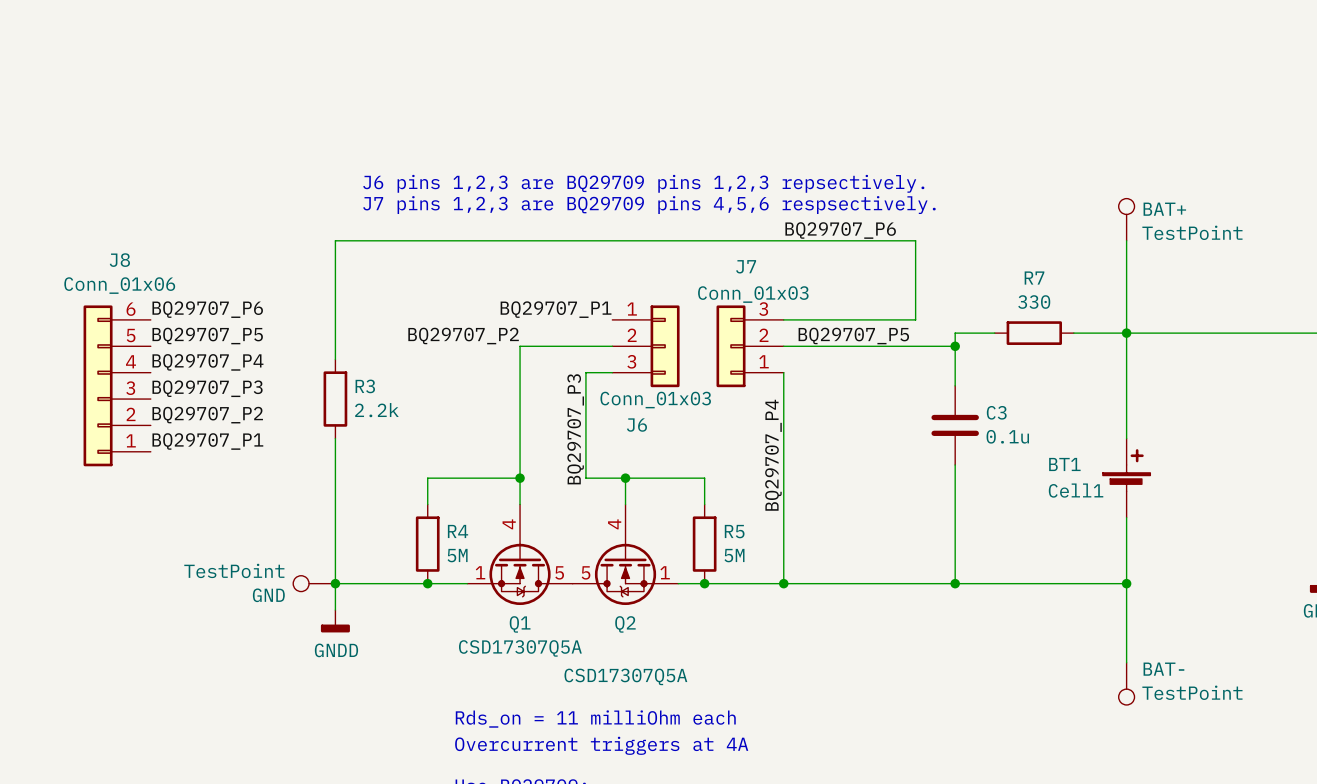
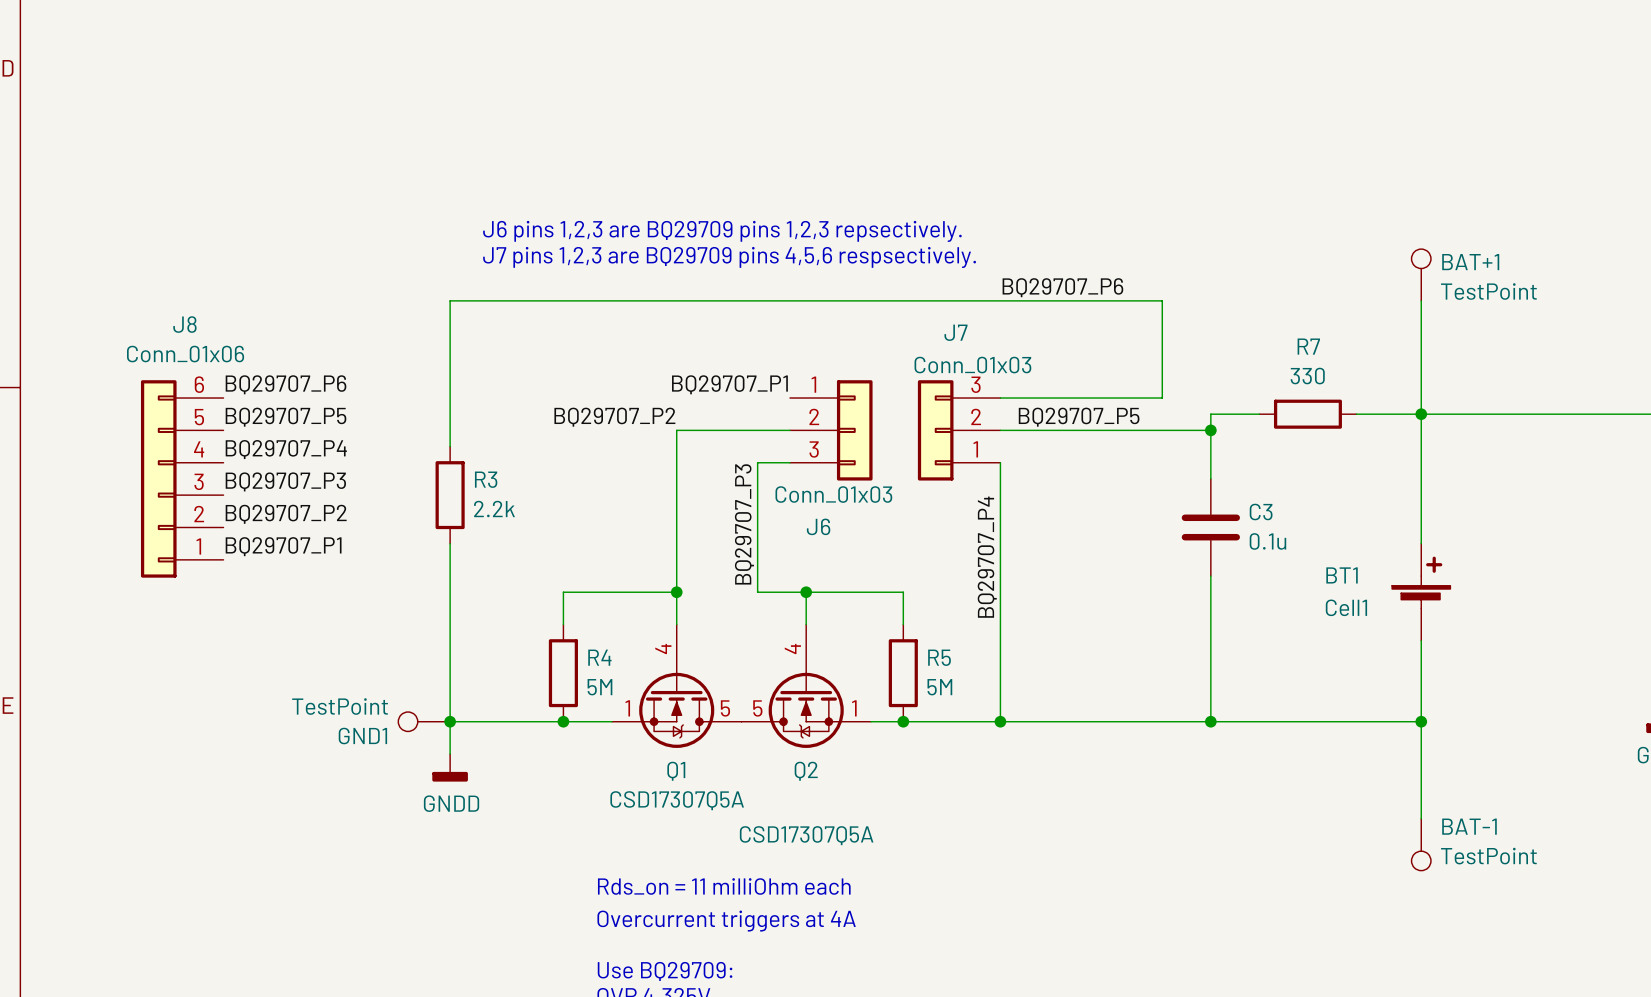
BAT+ name: BAT+ (1164, 209) -> BAT+1 (1470, 262)
GND name: GND (268, 595) -> GND1 (362, 736)
BAT- name: BAT- (1163, 669) -> BAT-1 (1469, 826)

